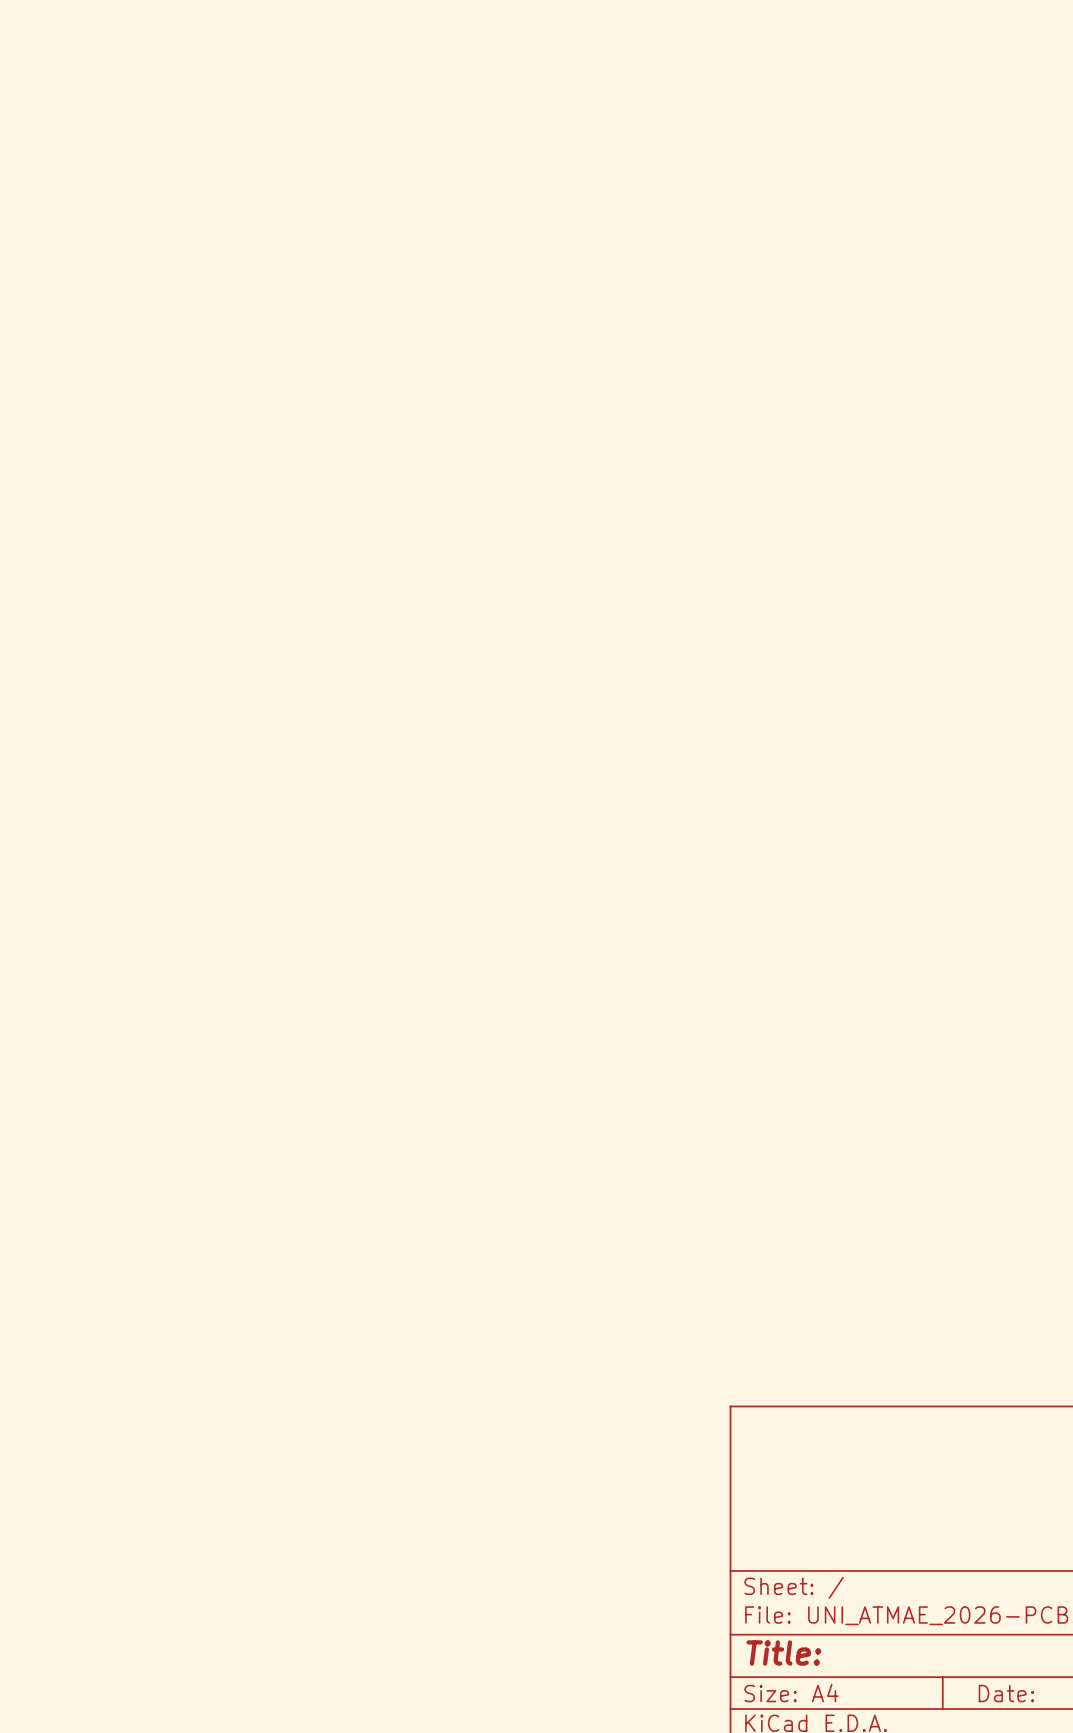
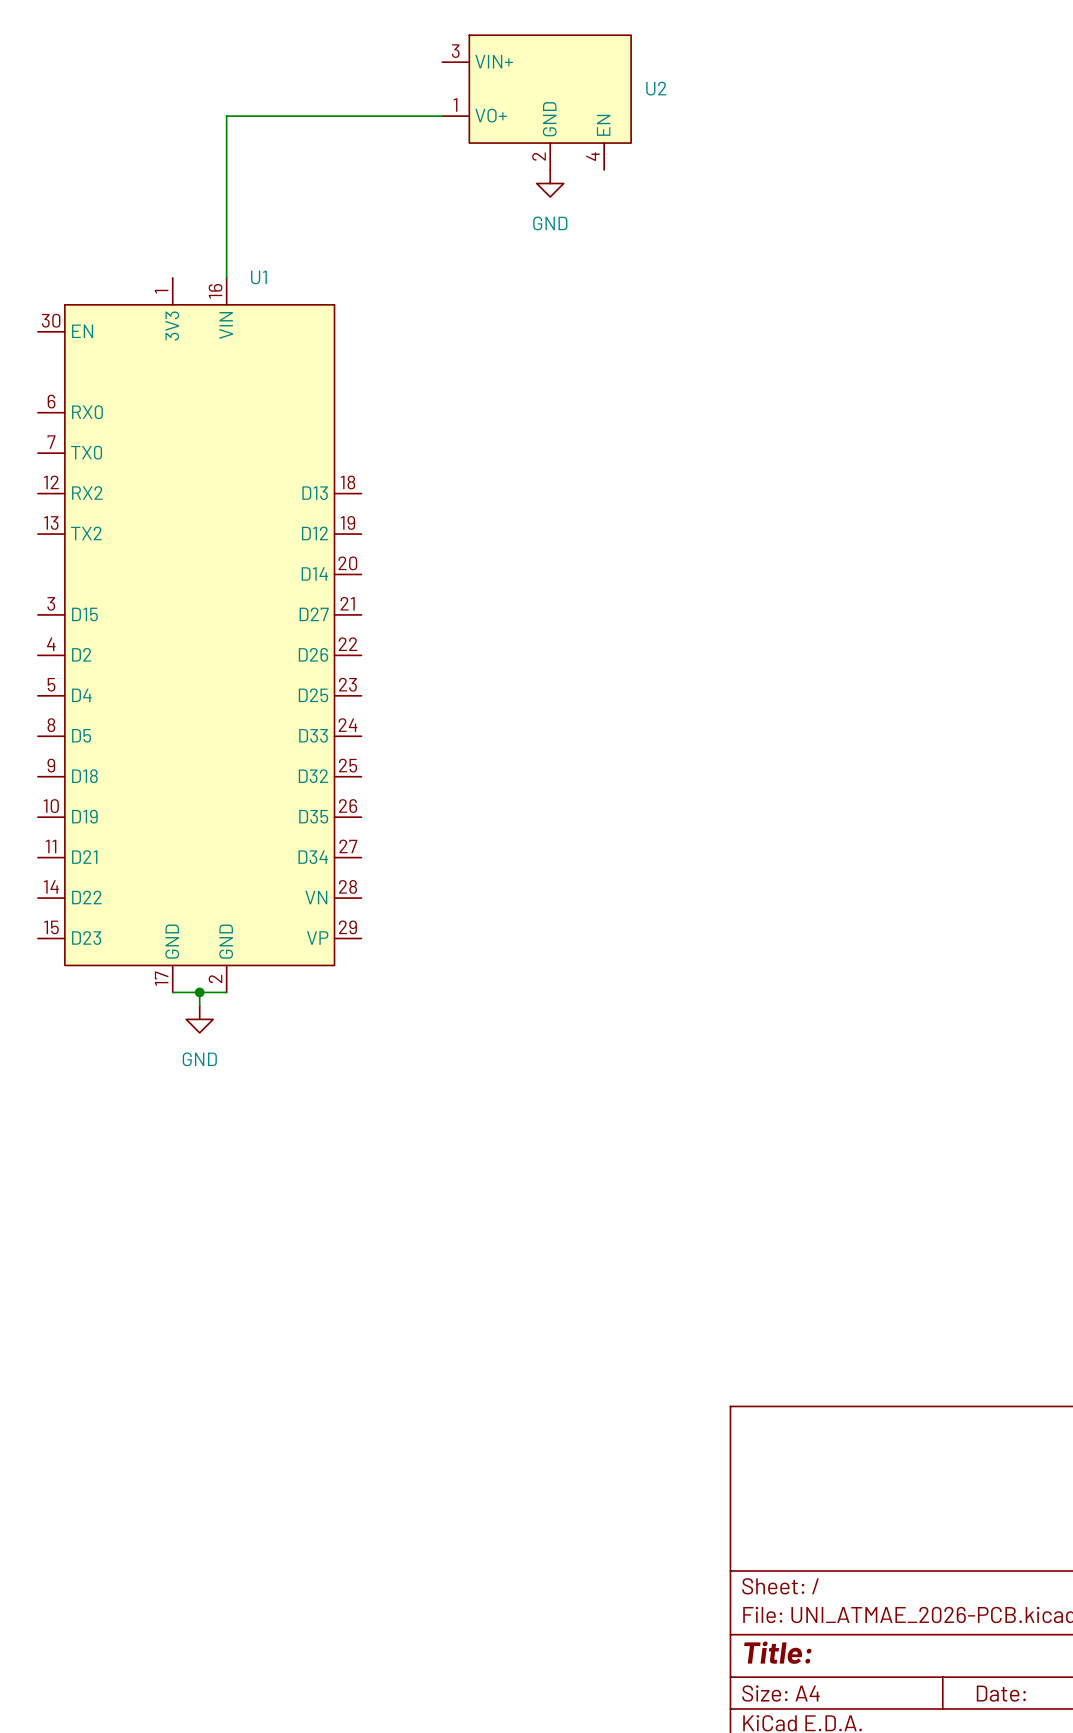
U2: none -> (536, 102)
wire: none -> (442, 116) (226, 116) (226, 277)
power symbol: none -> GND (550, 183)
U1: none -> (199, 635)
wire: none -> (172, 992) (226, 992)
wire: none -> (199, 992) (199, 1005)
junction: none -> (199, 992)
power symbol: none -> GND (199, 1019)

